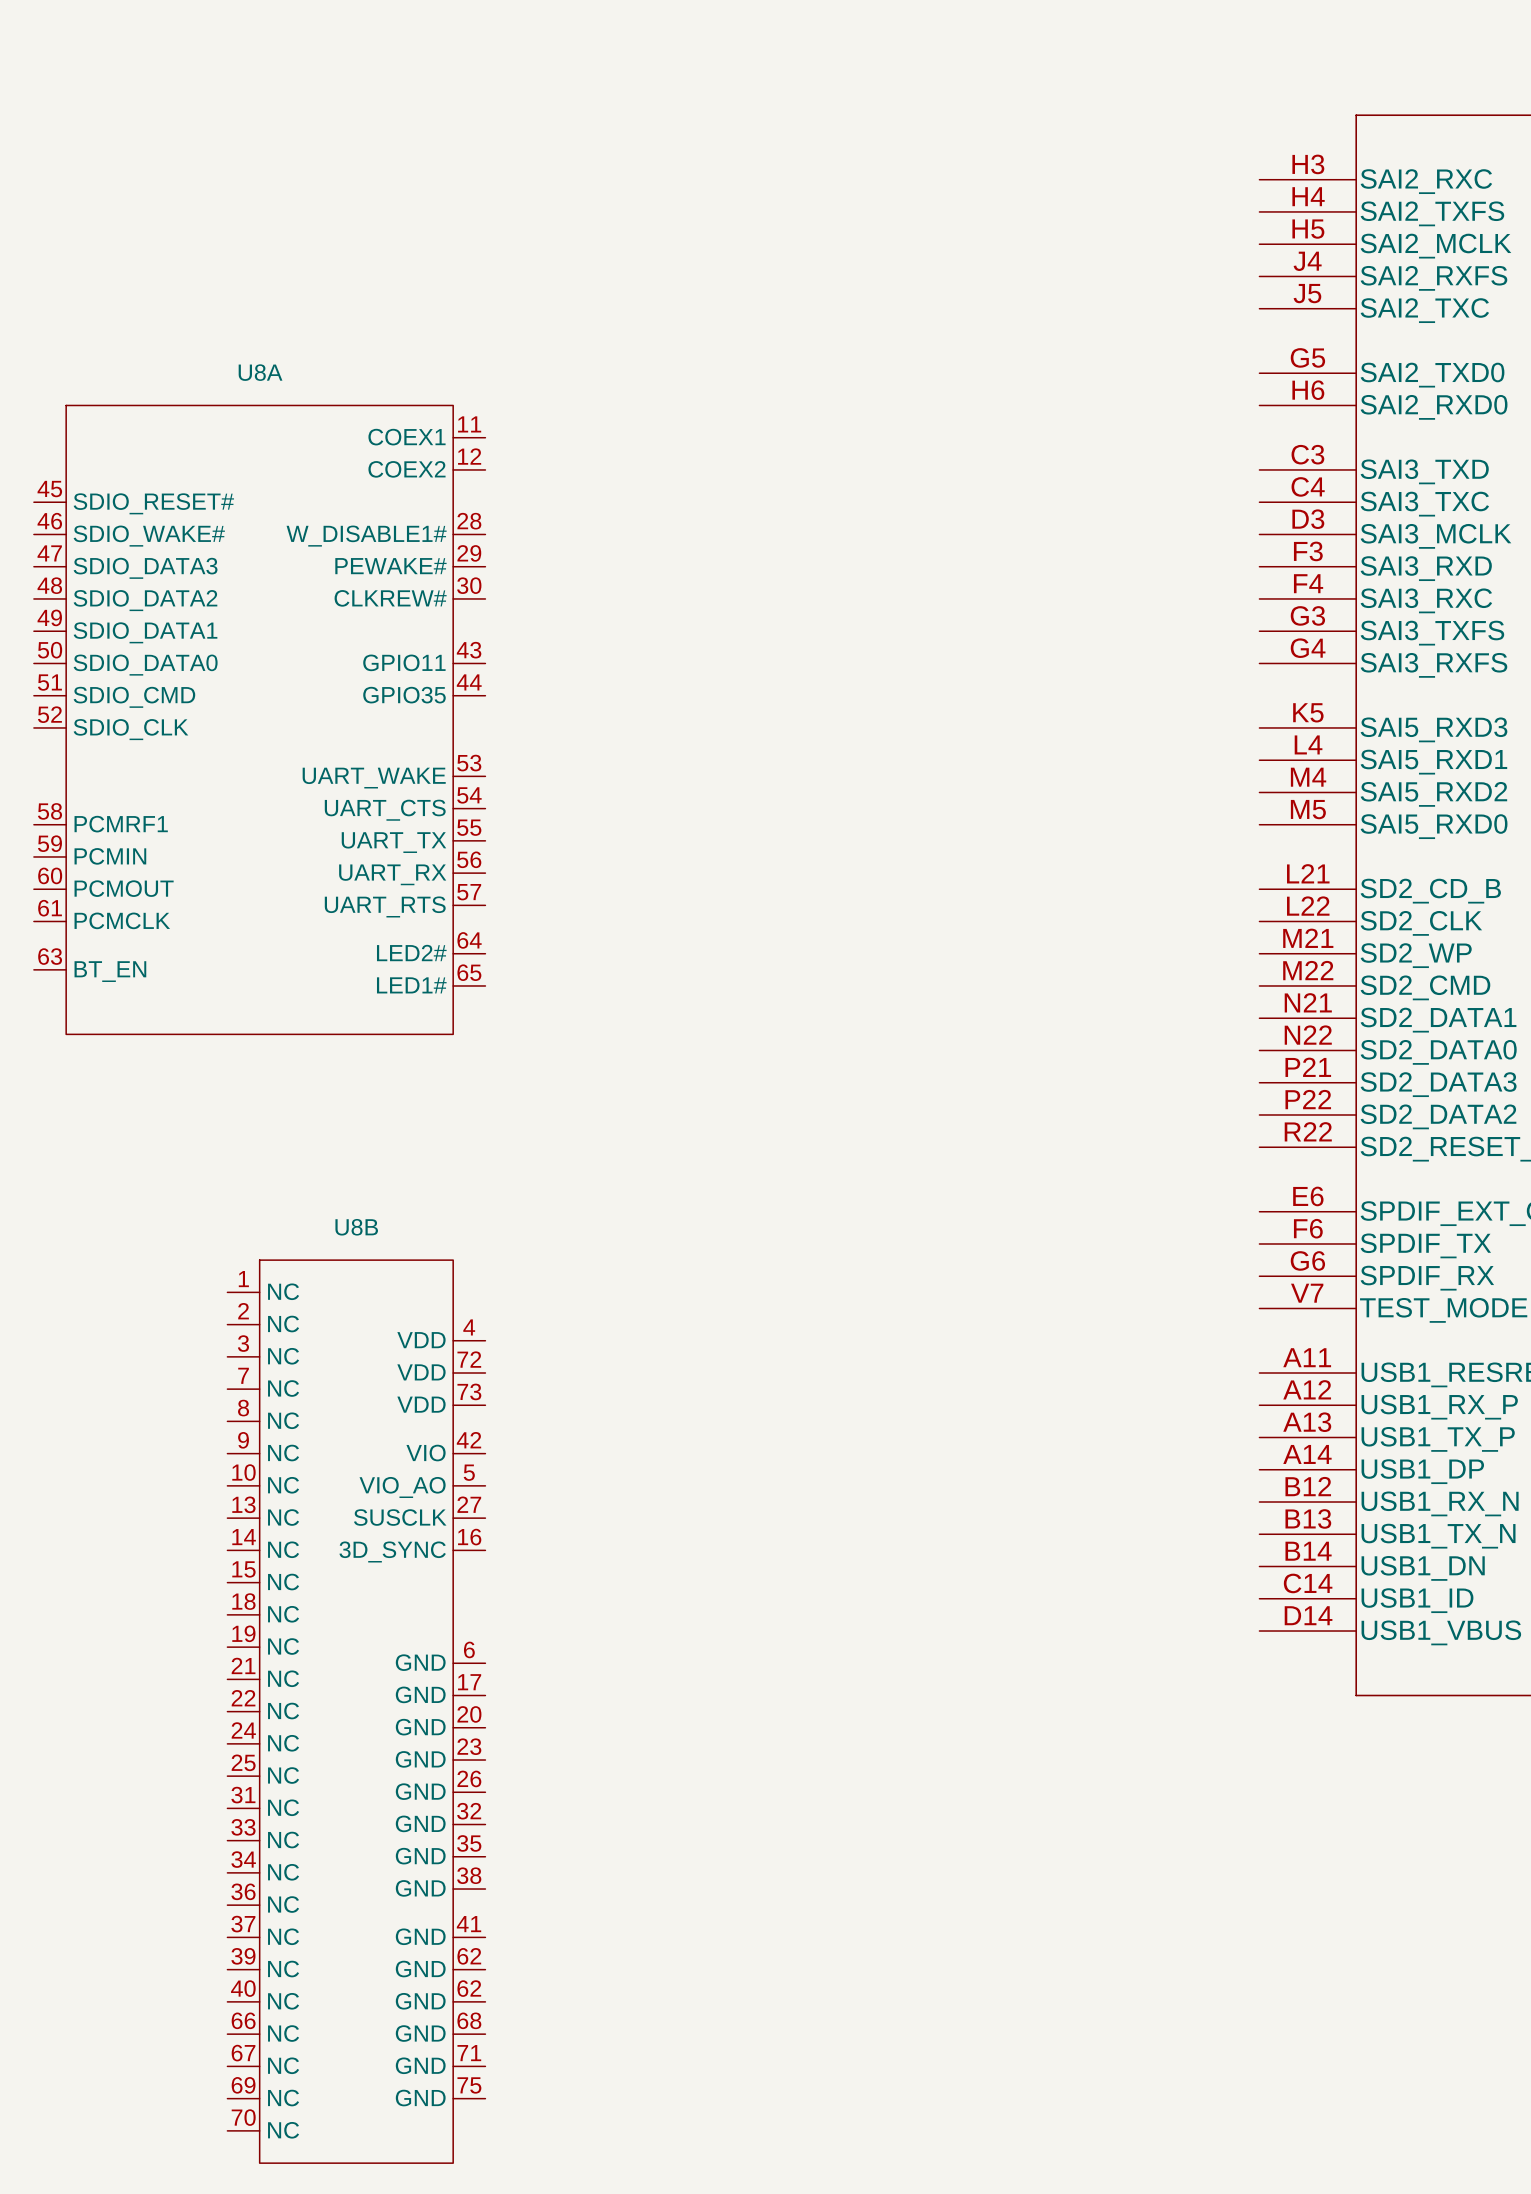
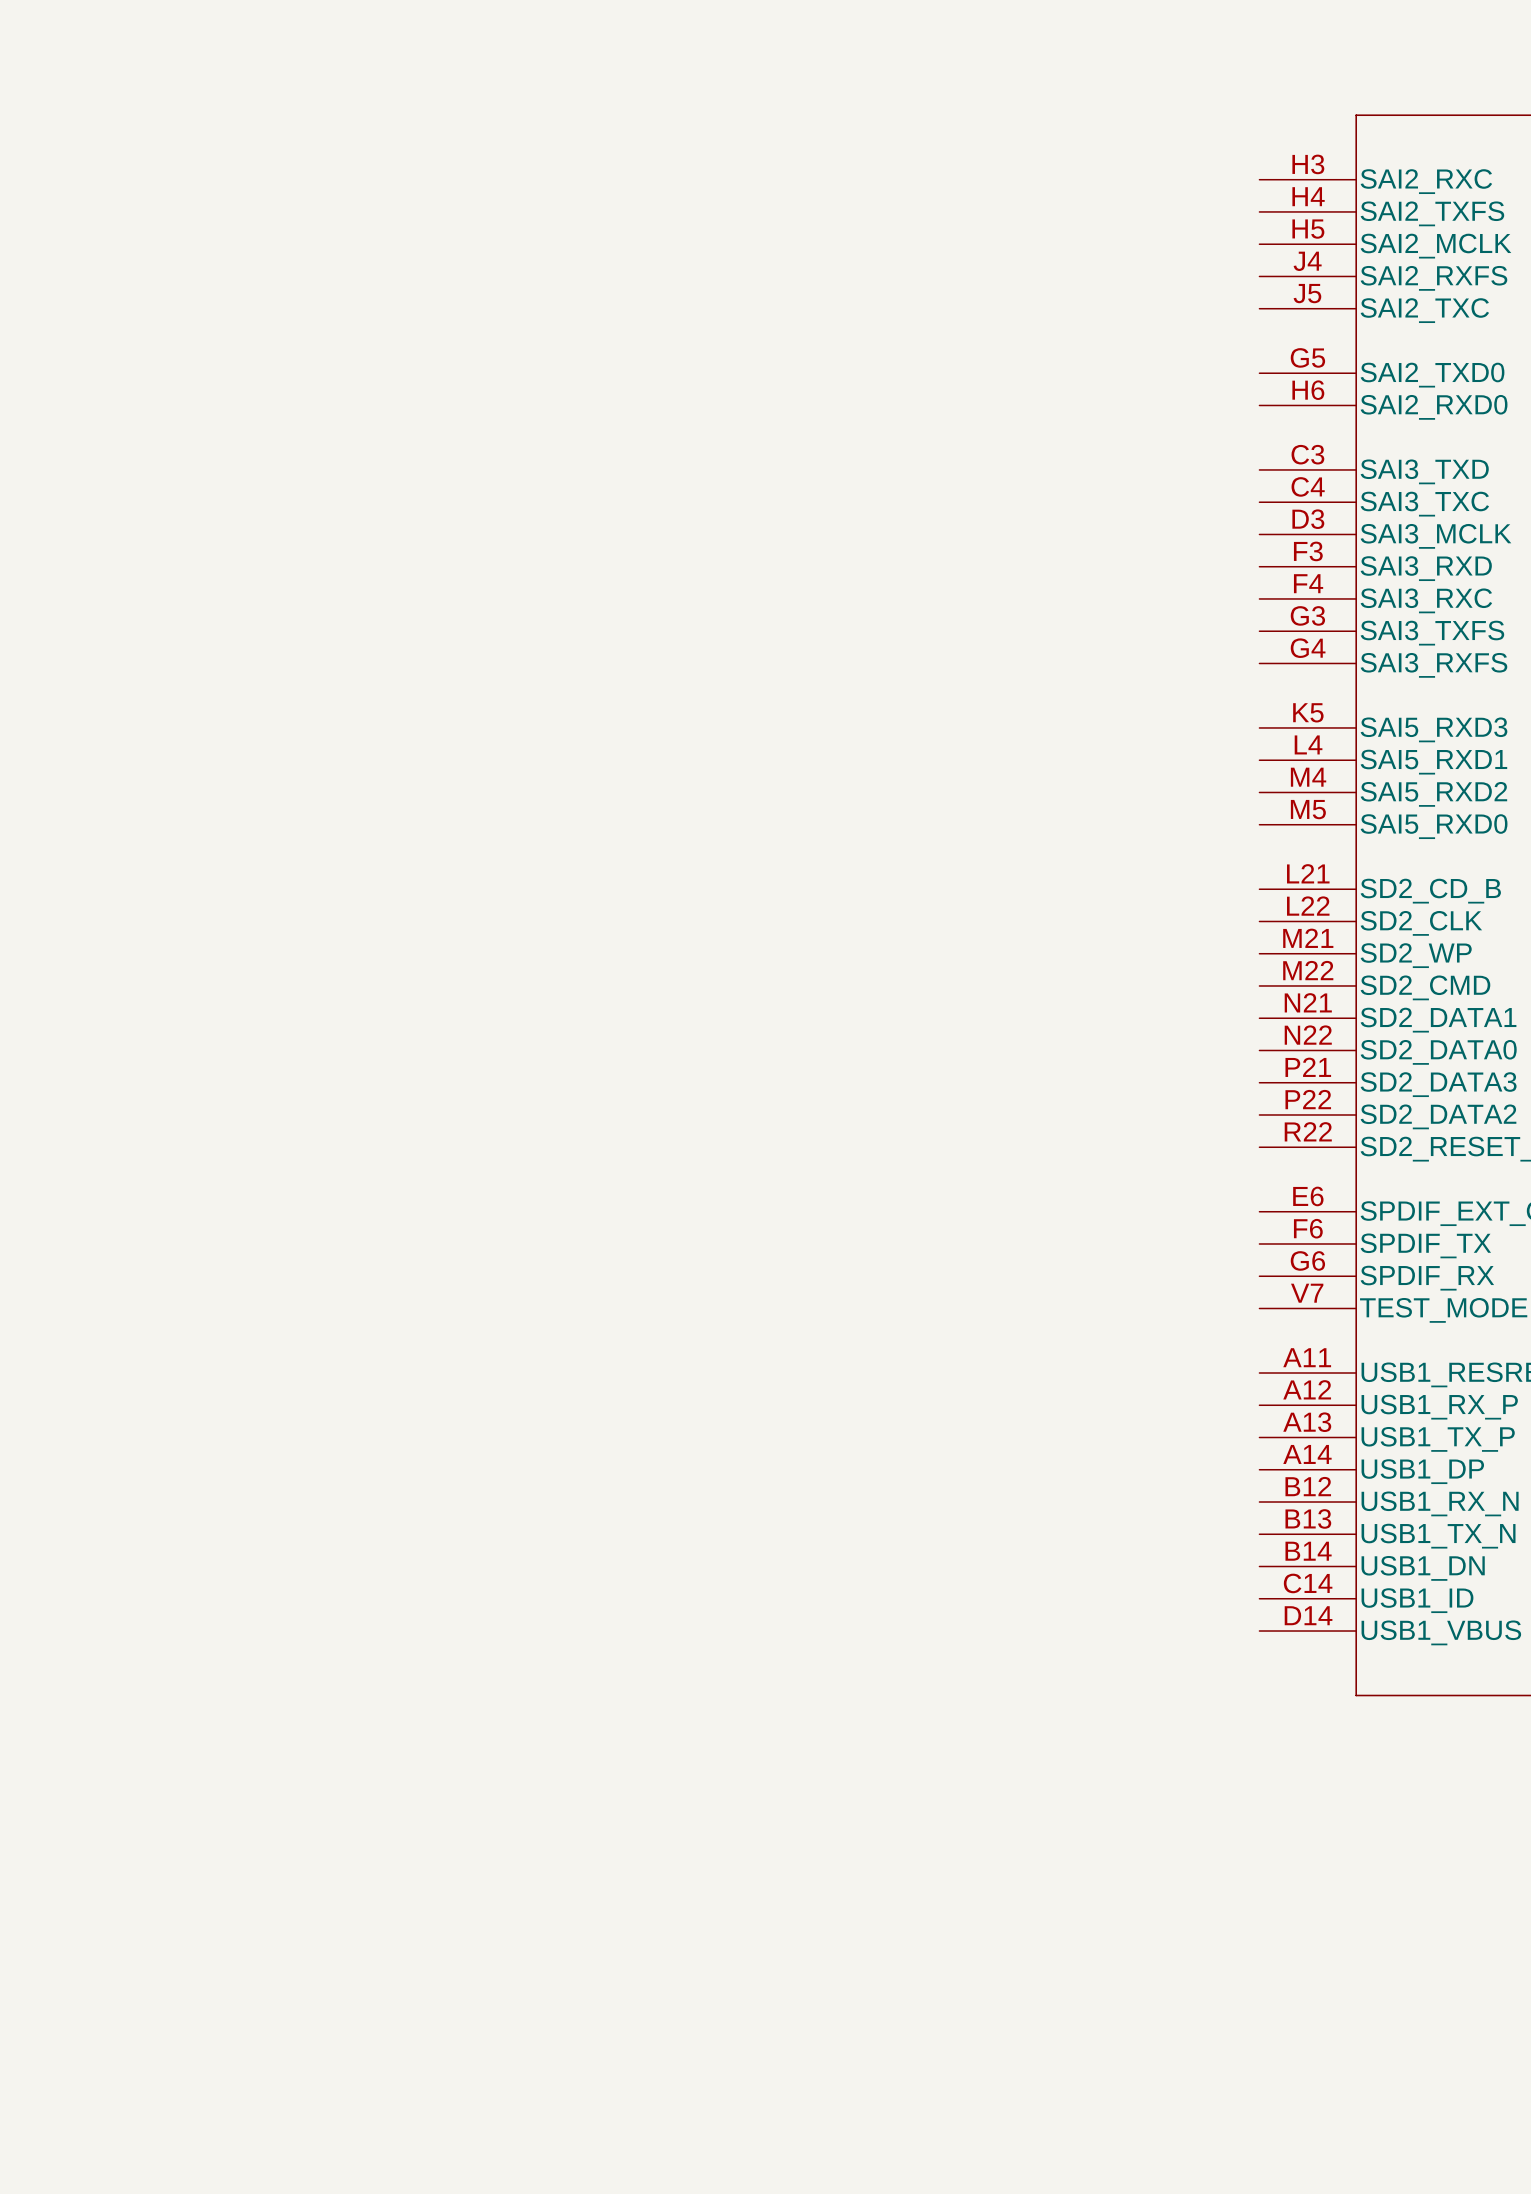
U8A: (259, 719) -> none
U8B: (356, 1711) -> none

